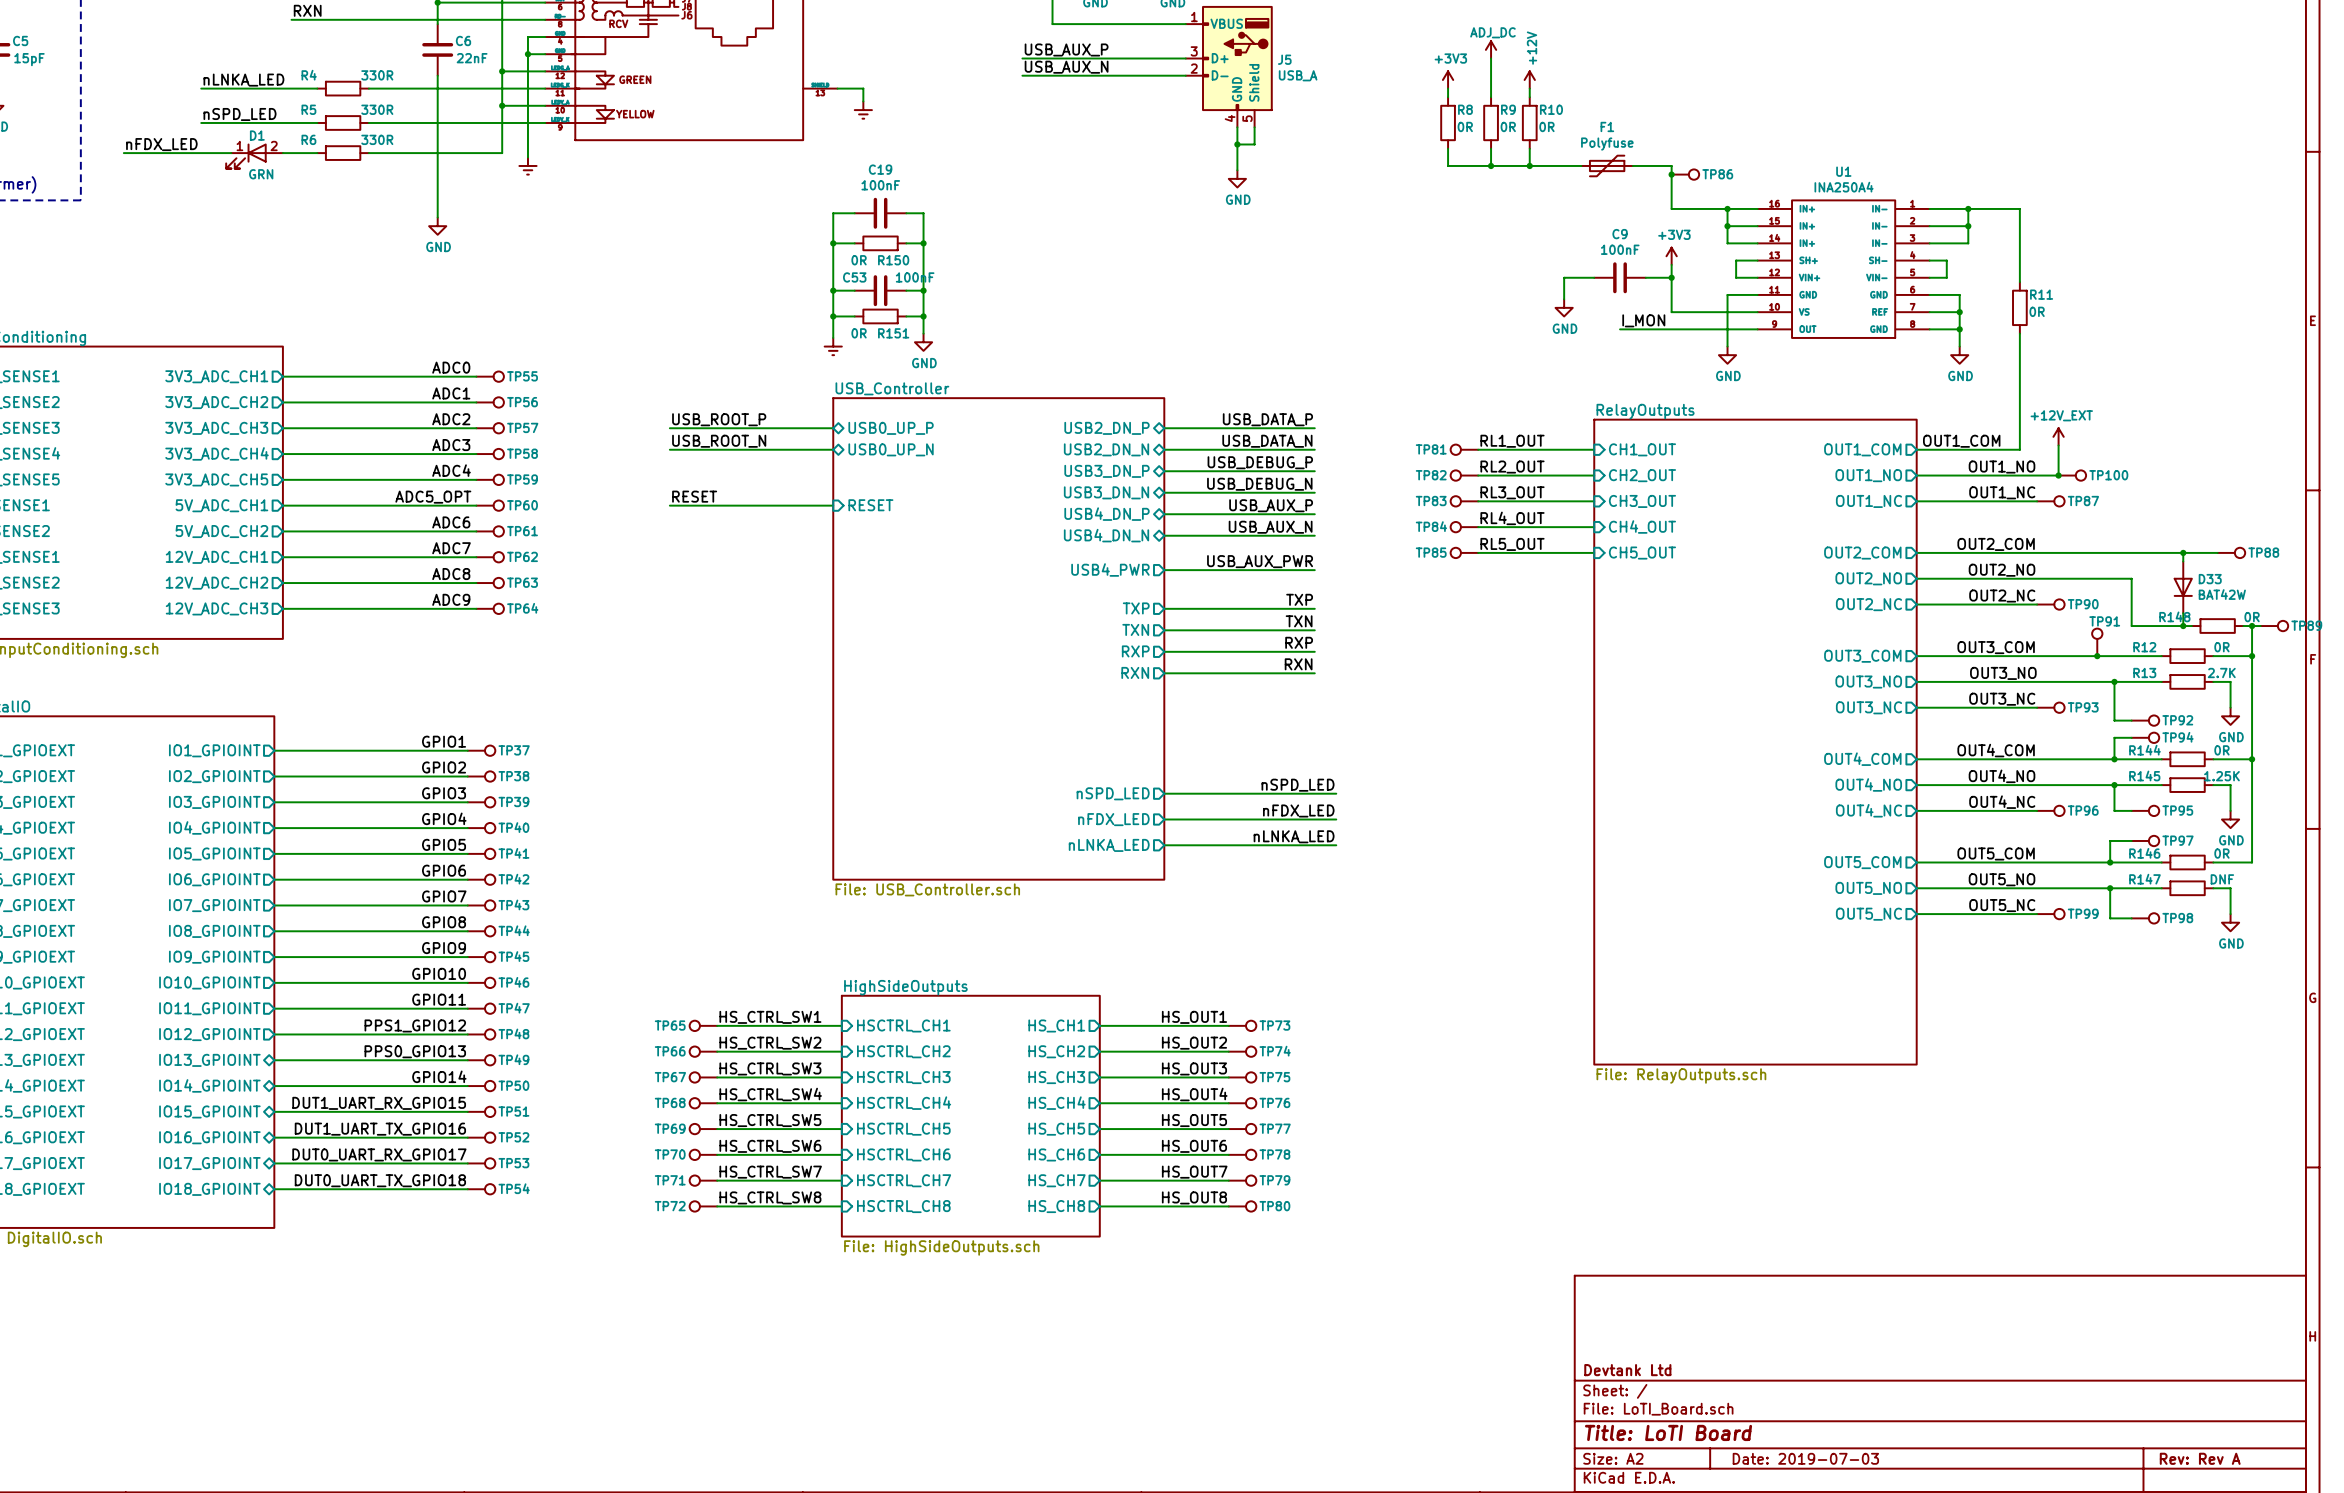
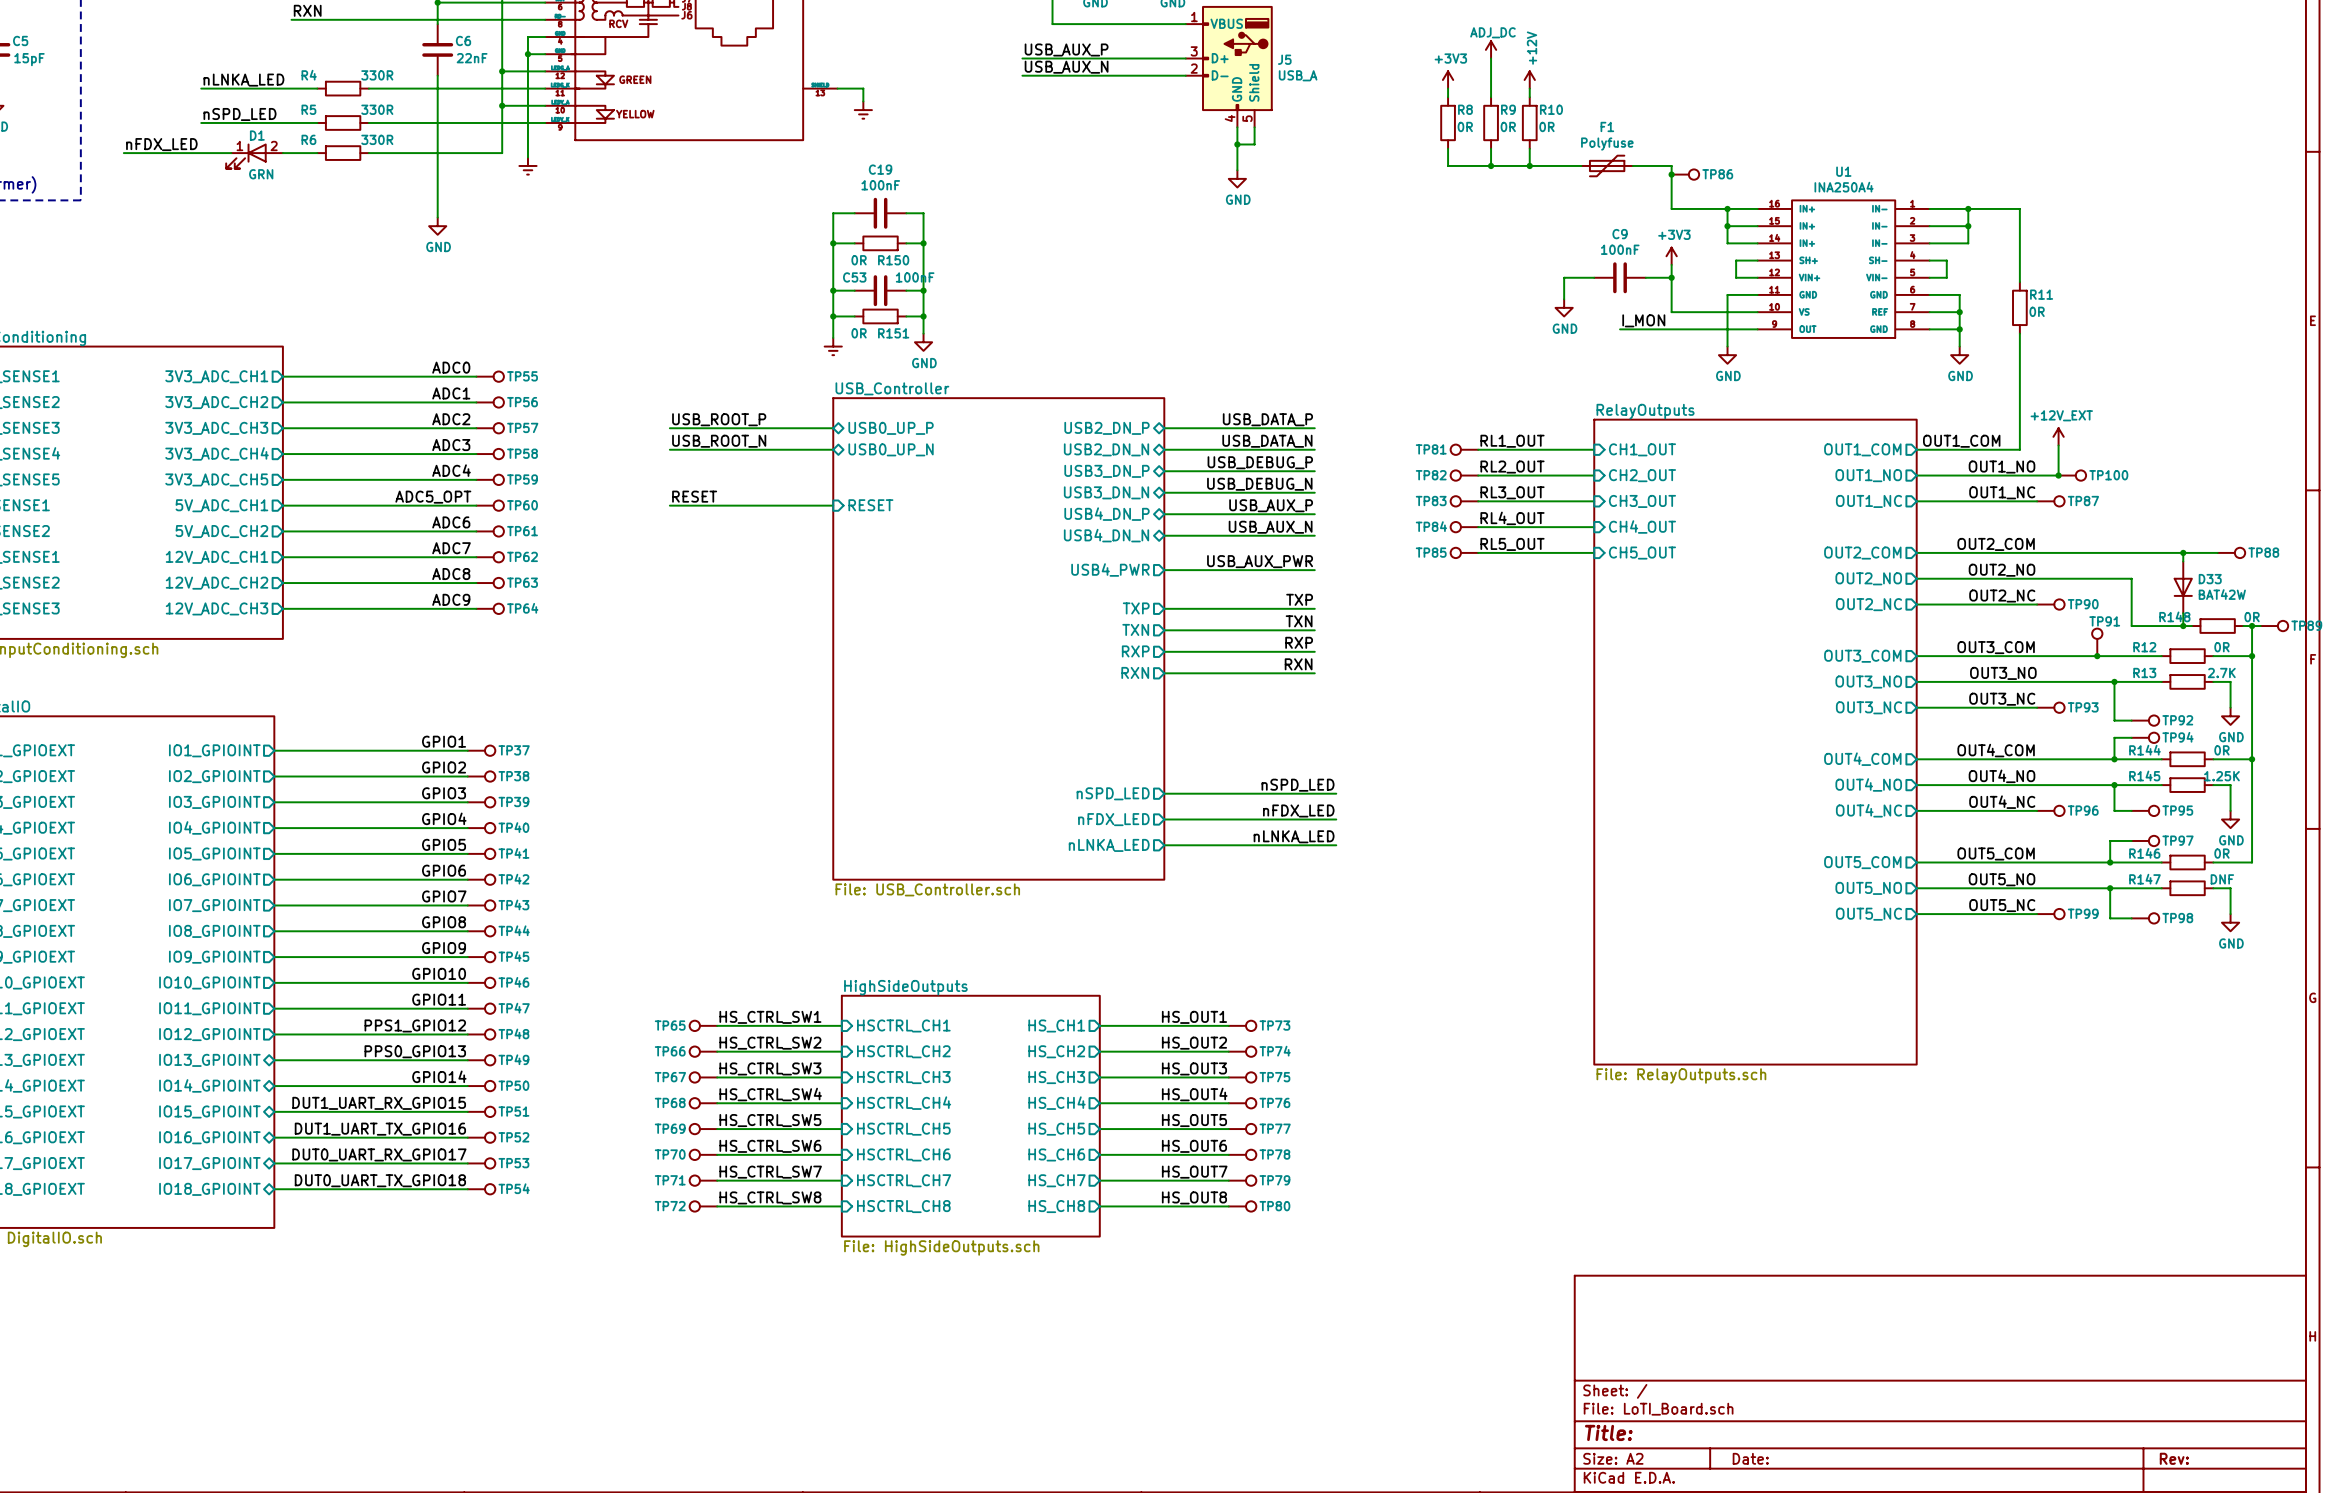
title block: Devtank Ltd (1627, 1370) -> none
title block: Title: LoTI Board (1668, 1432) -> Title: (1608, 1432)
title block: Date: 2019-07-03 (1805, 1458) -> Date: (1750, 1458)
title block: Rev: Rev A (2200, 1458) -> Rev: (2174, 1458)

